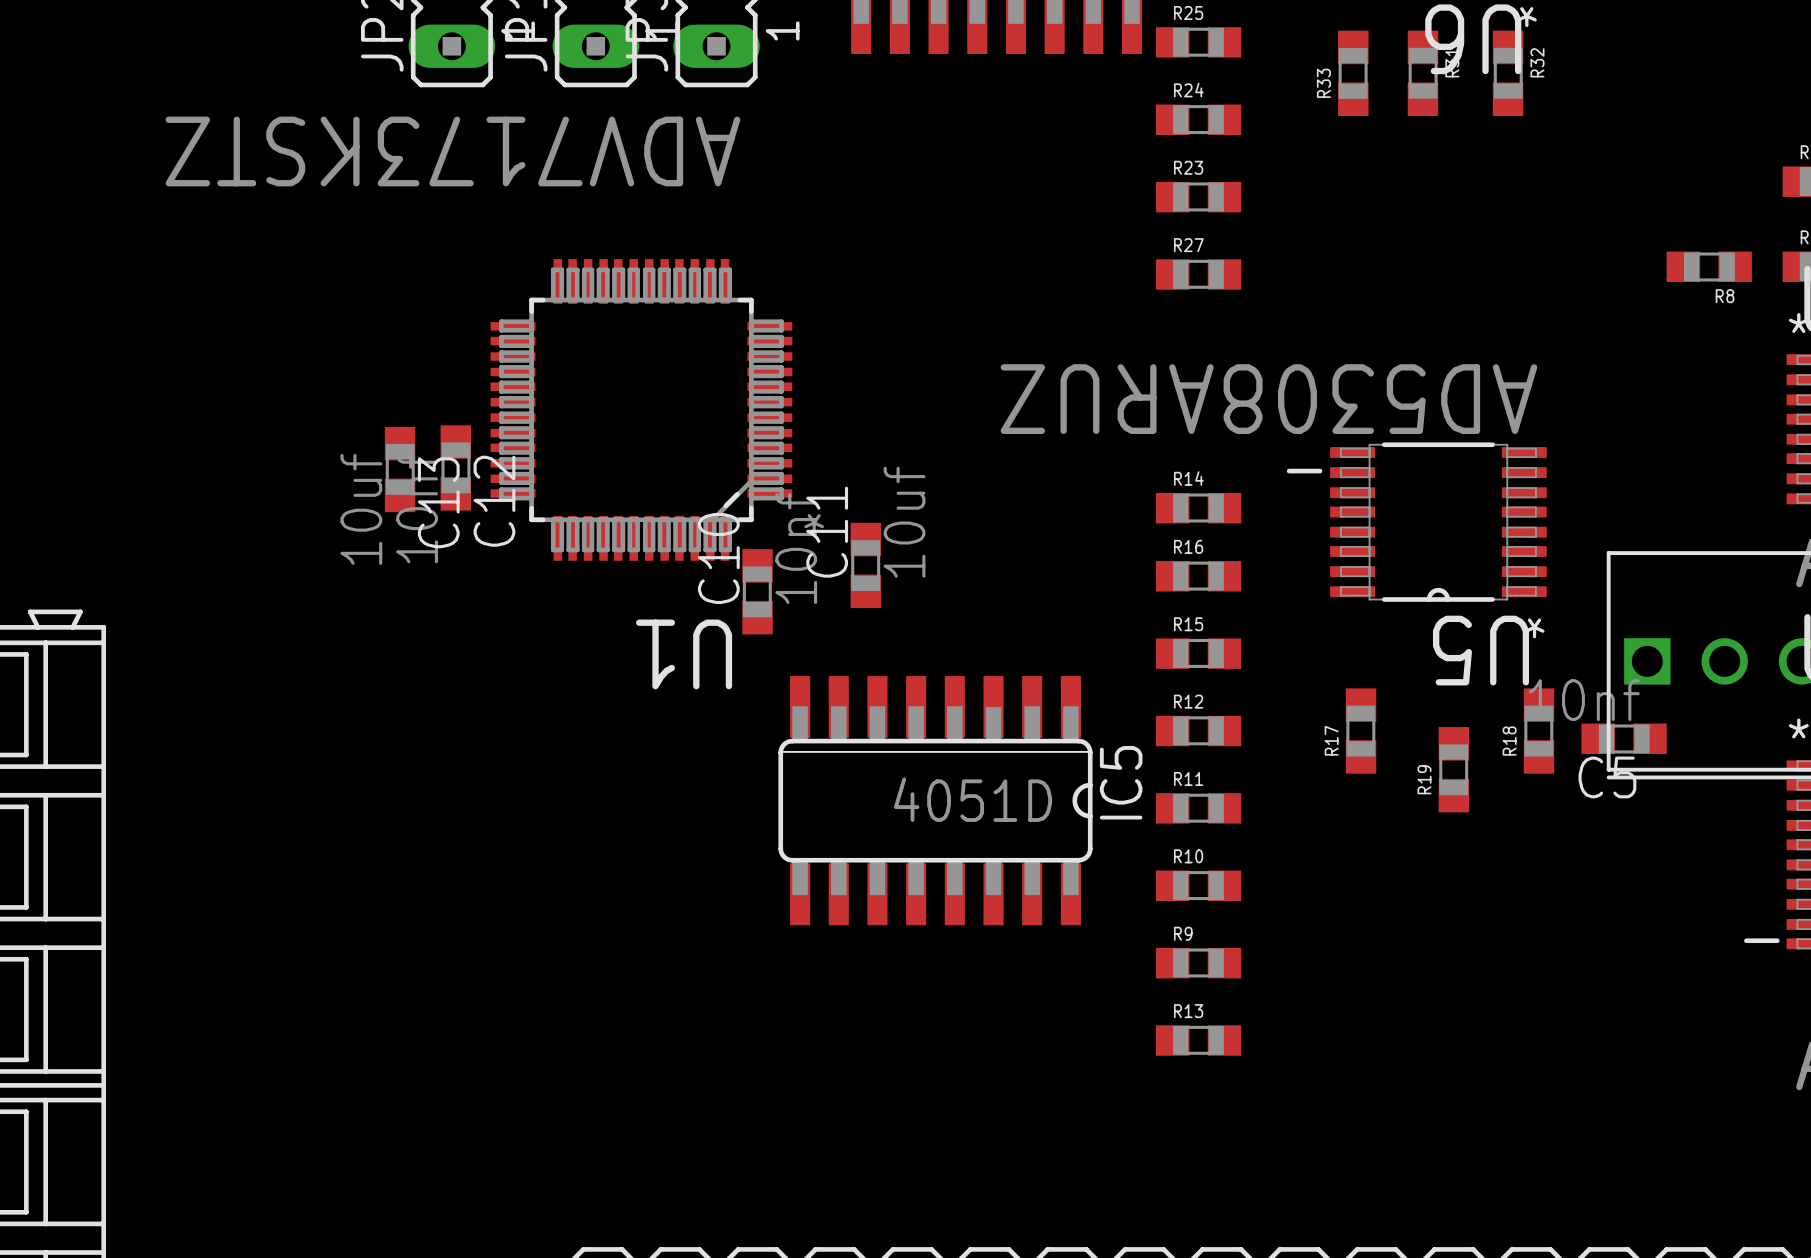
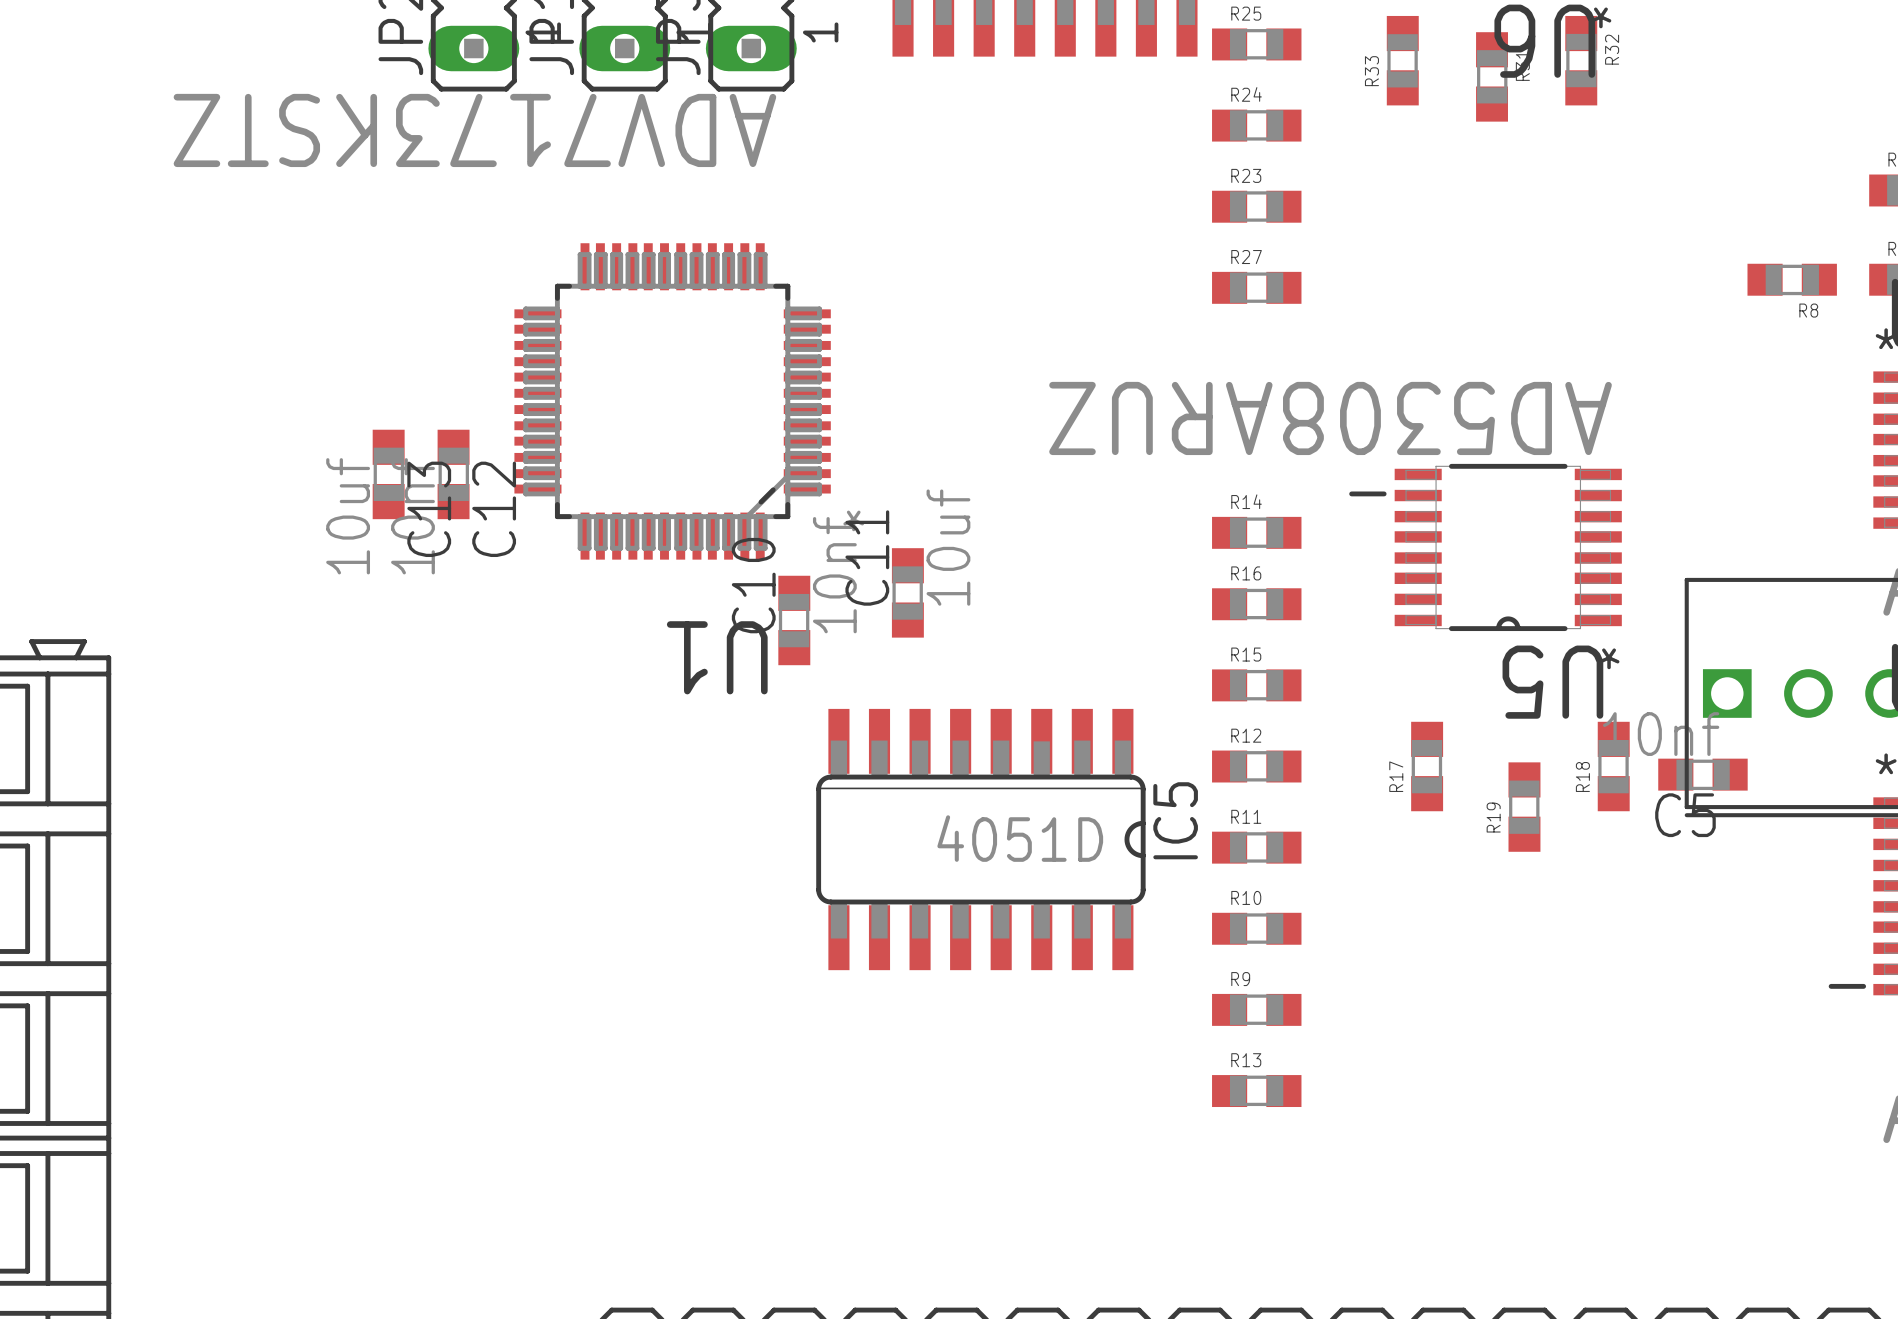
R33 position: (1353, 73) -> (1402, 60)
R32 position: (1508, 73) -> (1581, 60)
U1 position: (641, 409) -> (672, 401)
C12 position: (455, 467) -> (453, 474)
C13 position: (400, 469) -> (388, 474)

